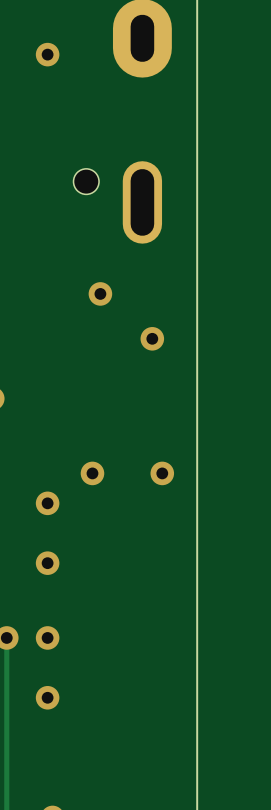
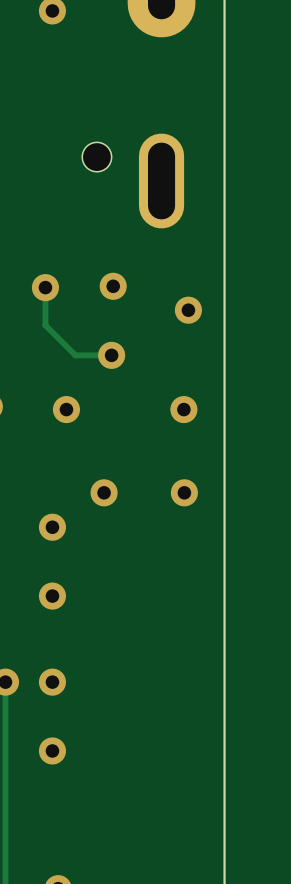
track: none -> (45, 287) (45, 325) (75, 355) (111, 355)
via: none -> (45, 287)
via: none -> (188, 310)
via: (152, 338) -> none
via: none -> (111, 355)
via: none -> (66, 409)
via: none -> (183, 409)

